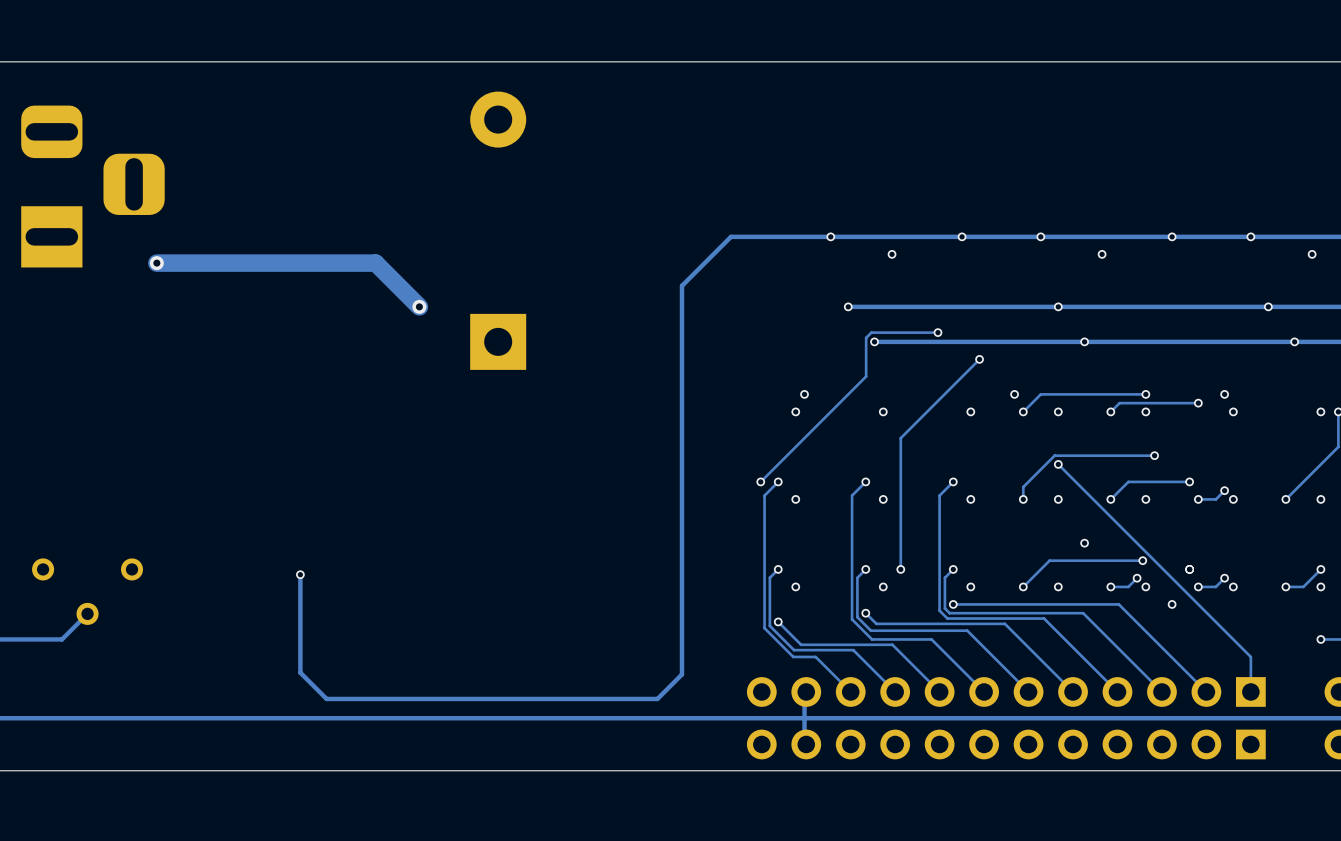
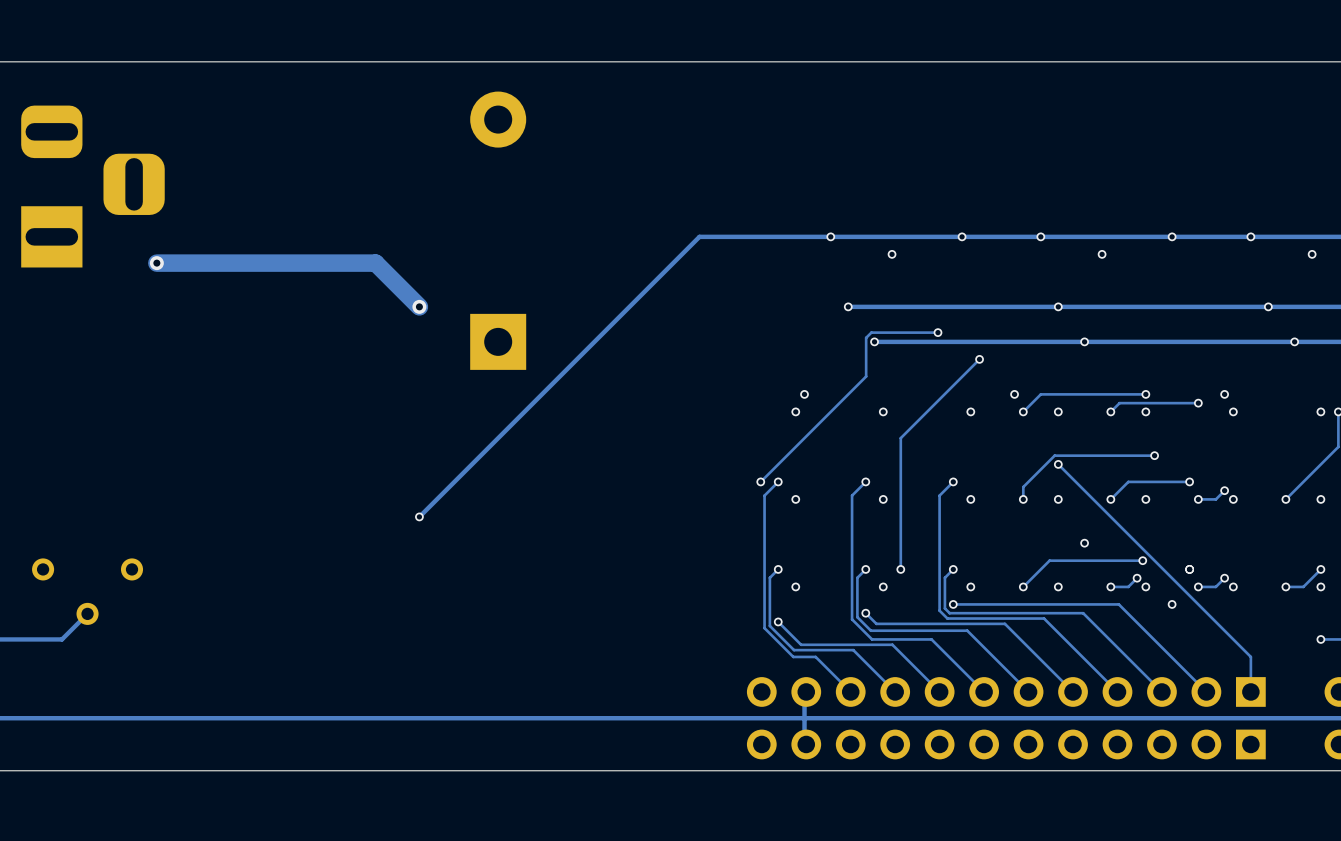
track: (731, 236) (681, 285) (681, 674) (657, 698) (326, 698) (300, 672) (300, 574) -> (731, 236) (699, 236) (419, 516)
via: none -> (419, 516)
via: (300, 574) -> none

